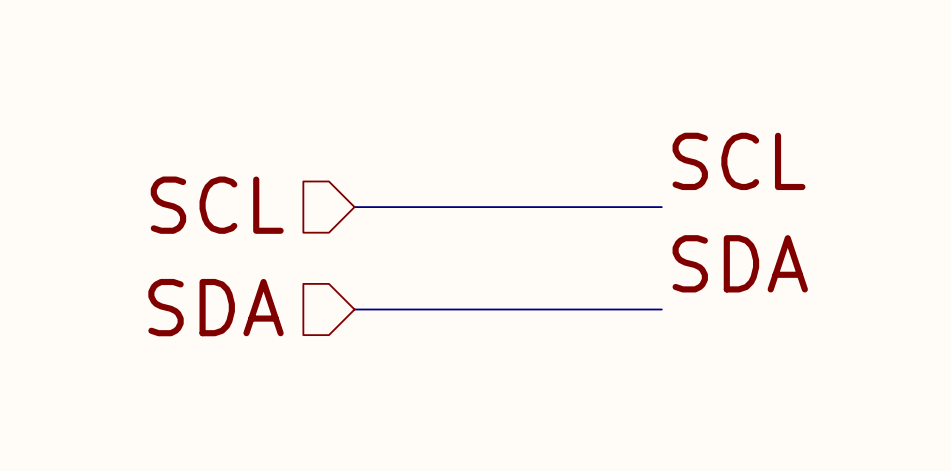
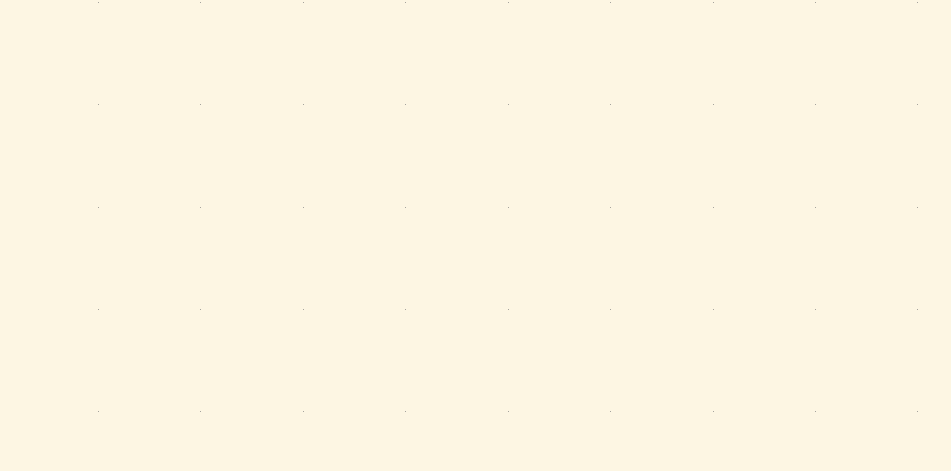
label: SCL (739, 161) -> none
hierarchical label: SCL (217, 205) -> none
wire: (354, 207) (661, 207) -> none
label: SDA (740, 263) -> none
hierarchical label: SDA (216, 307) -> none
wire: (354, 309) (661, 309) -> none

